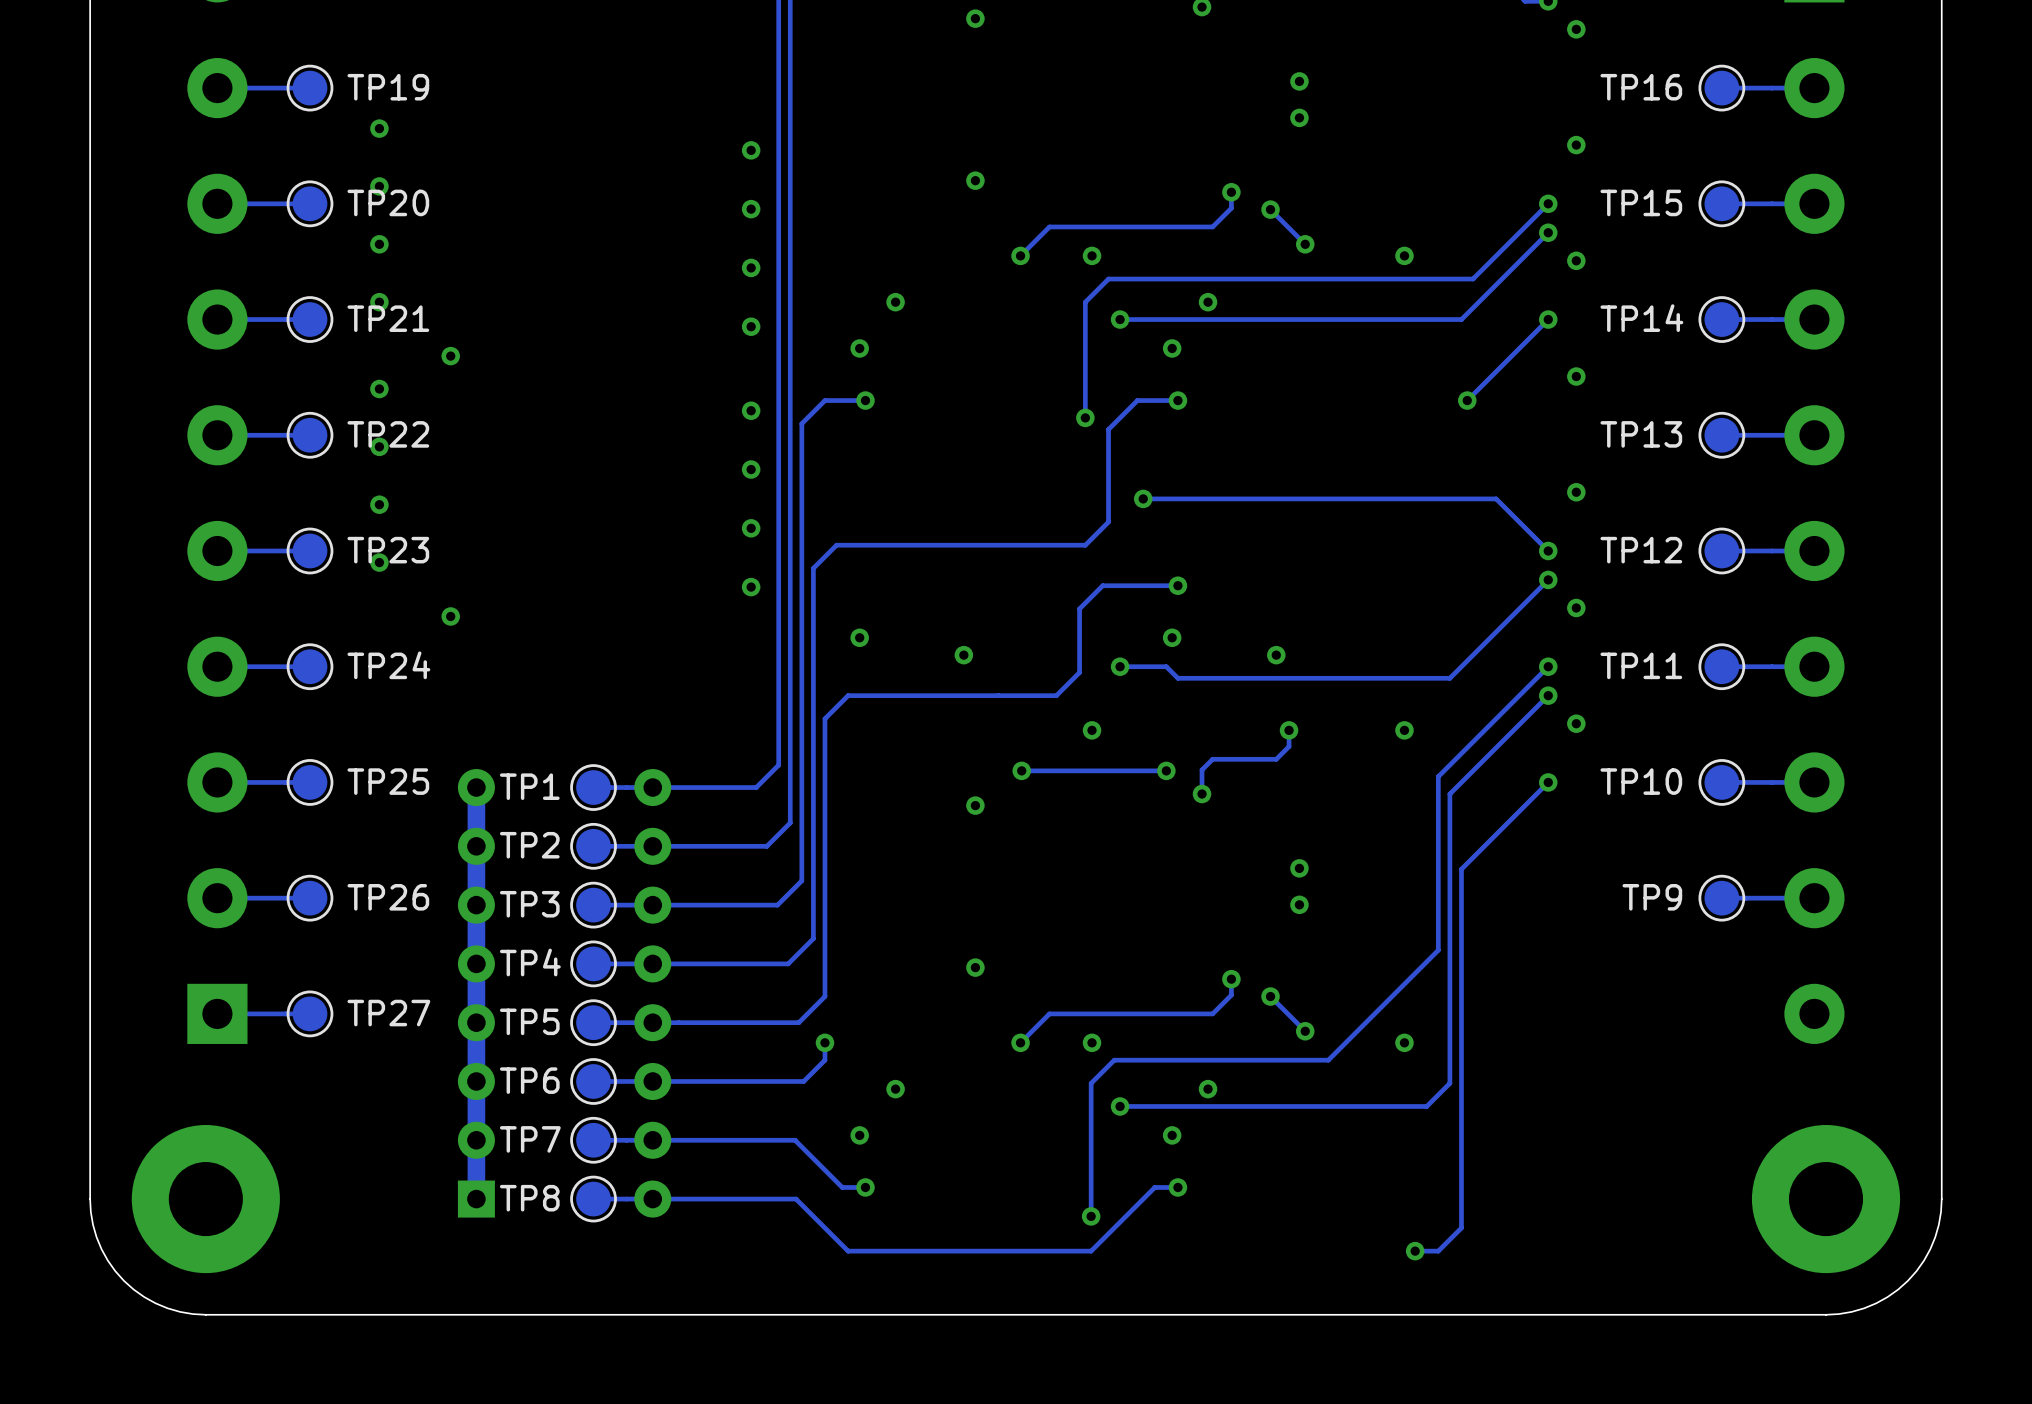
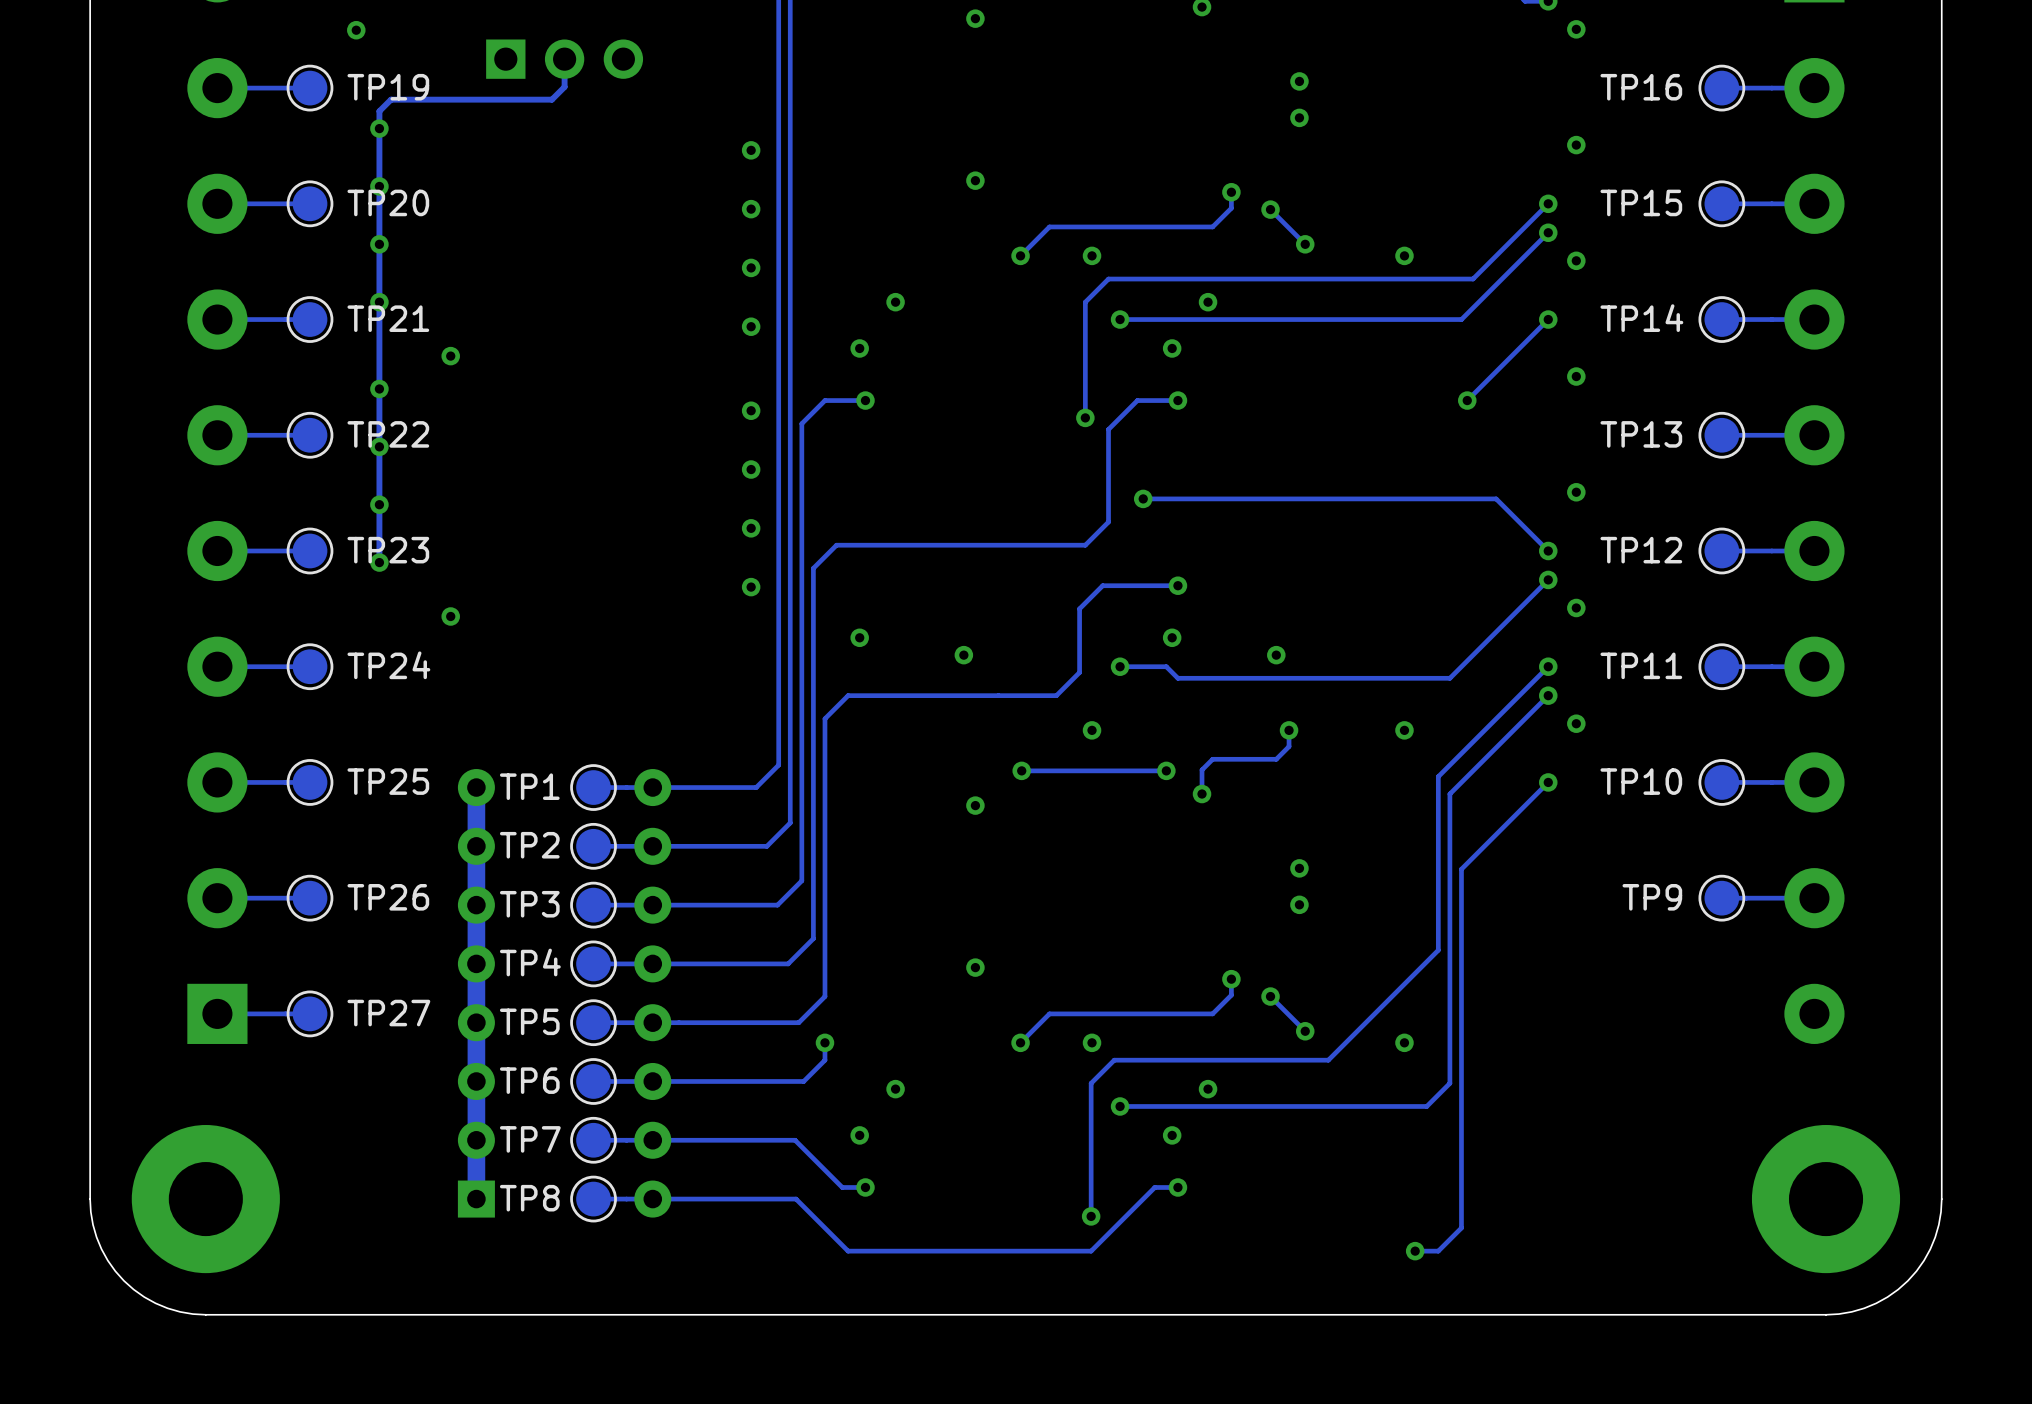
via: none -> (356, 30)
track: none -> (564, 59) (564, 86) (551, 99) (391, 99) (379, 111) (379, 562)
part: none -> (564, 59)

